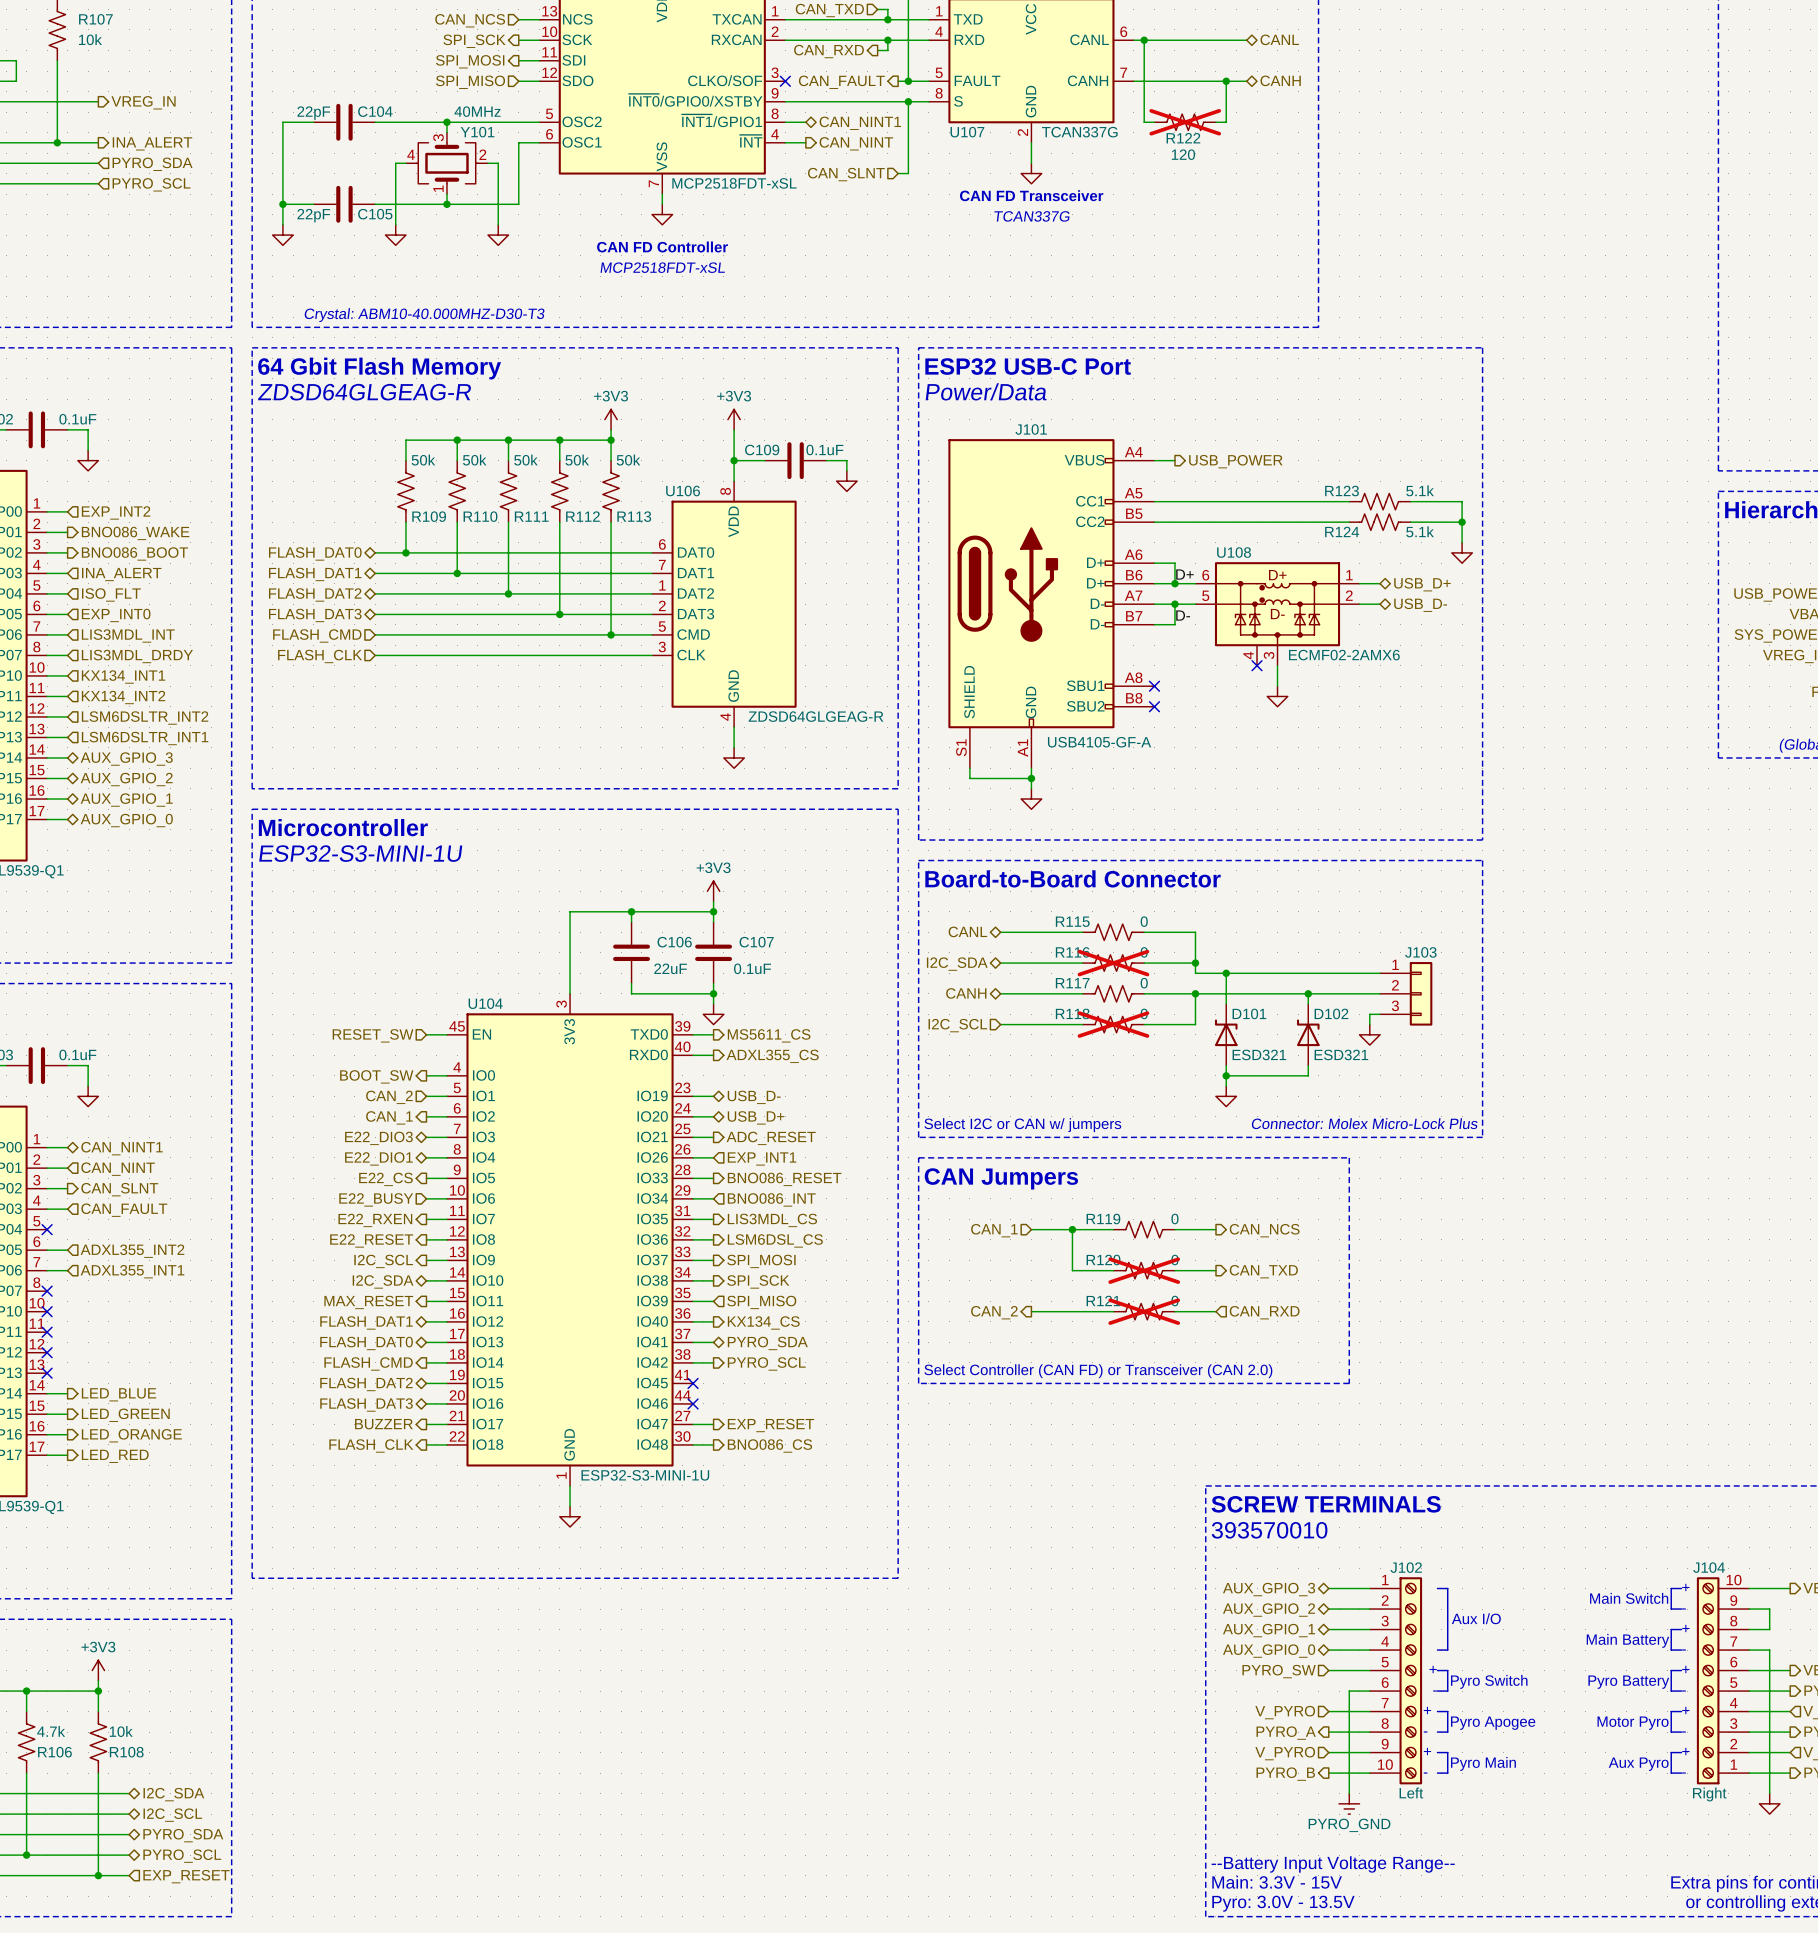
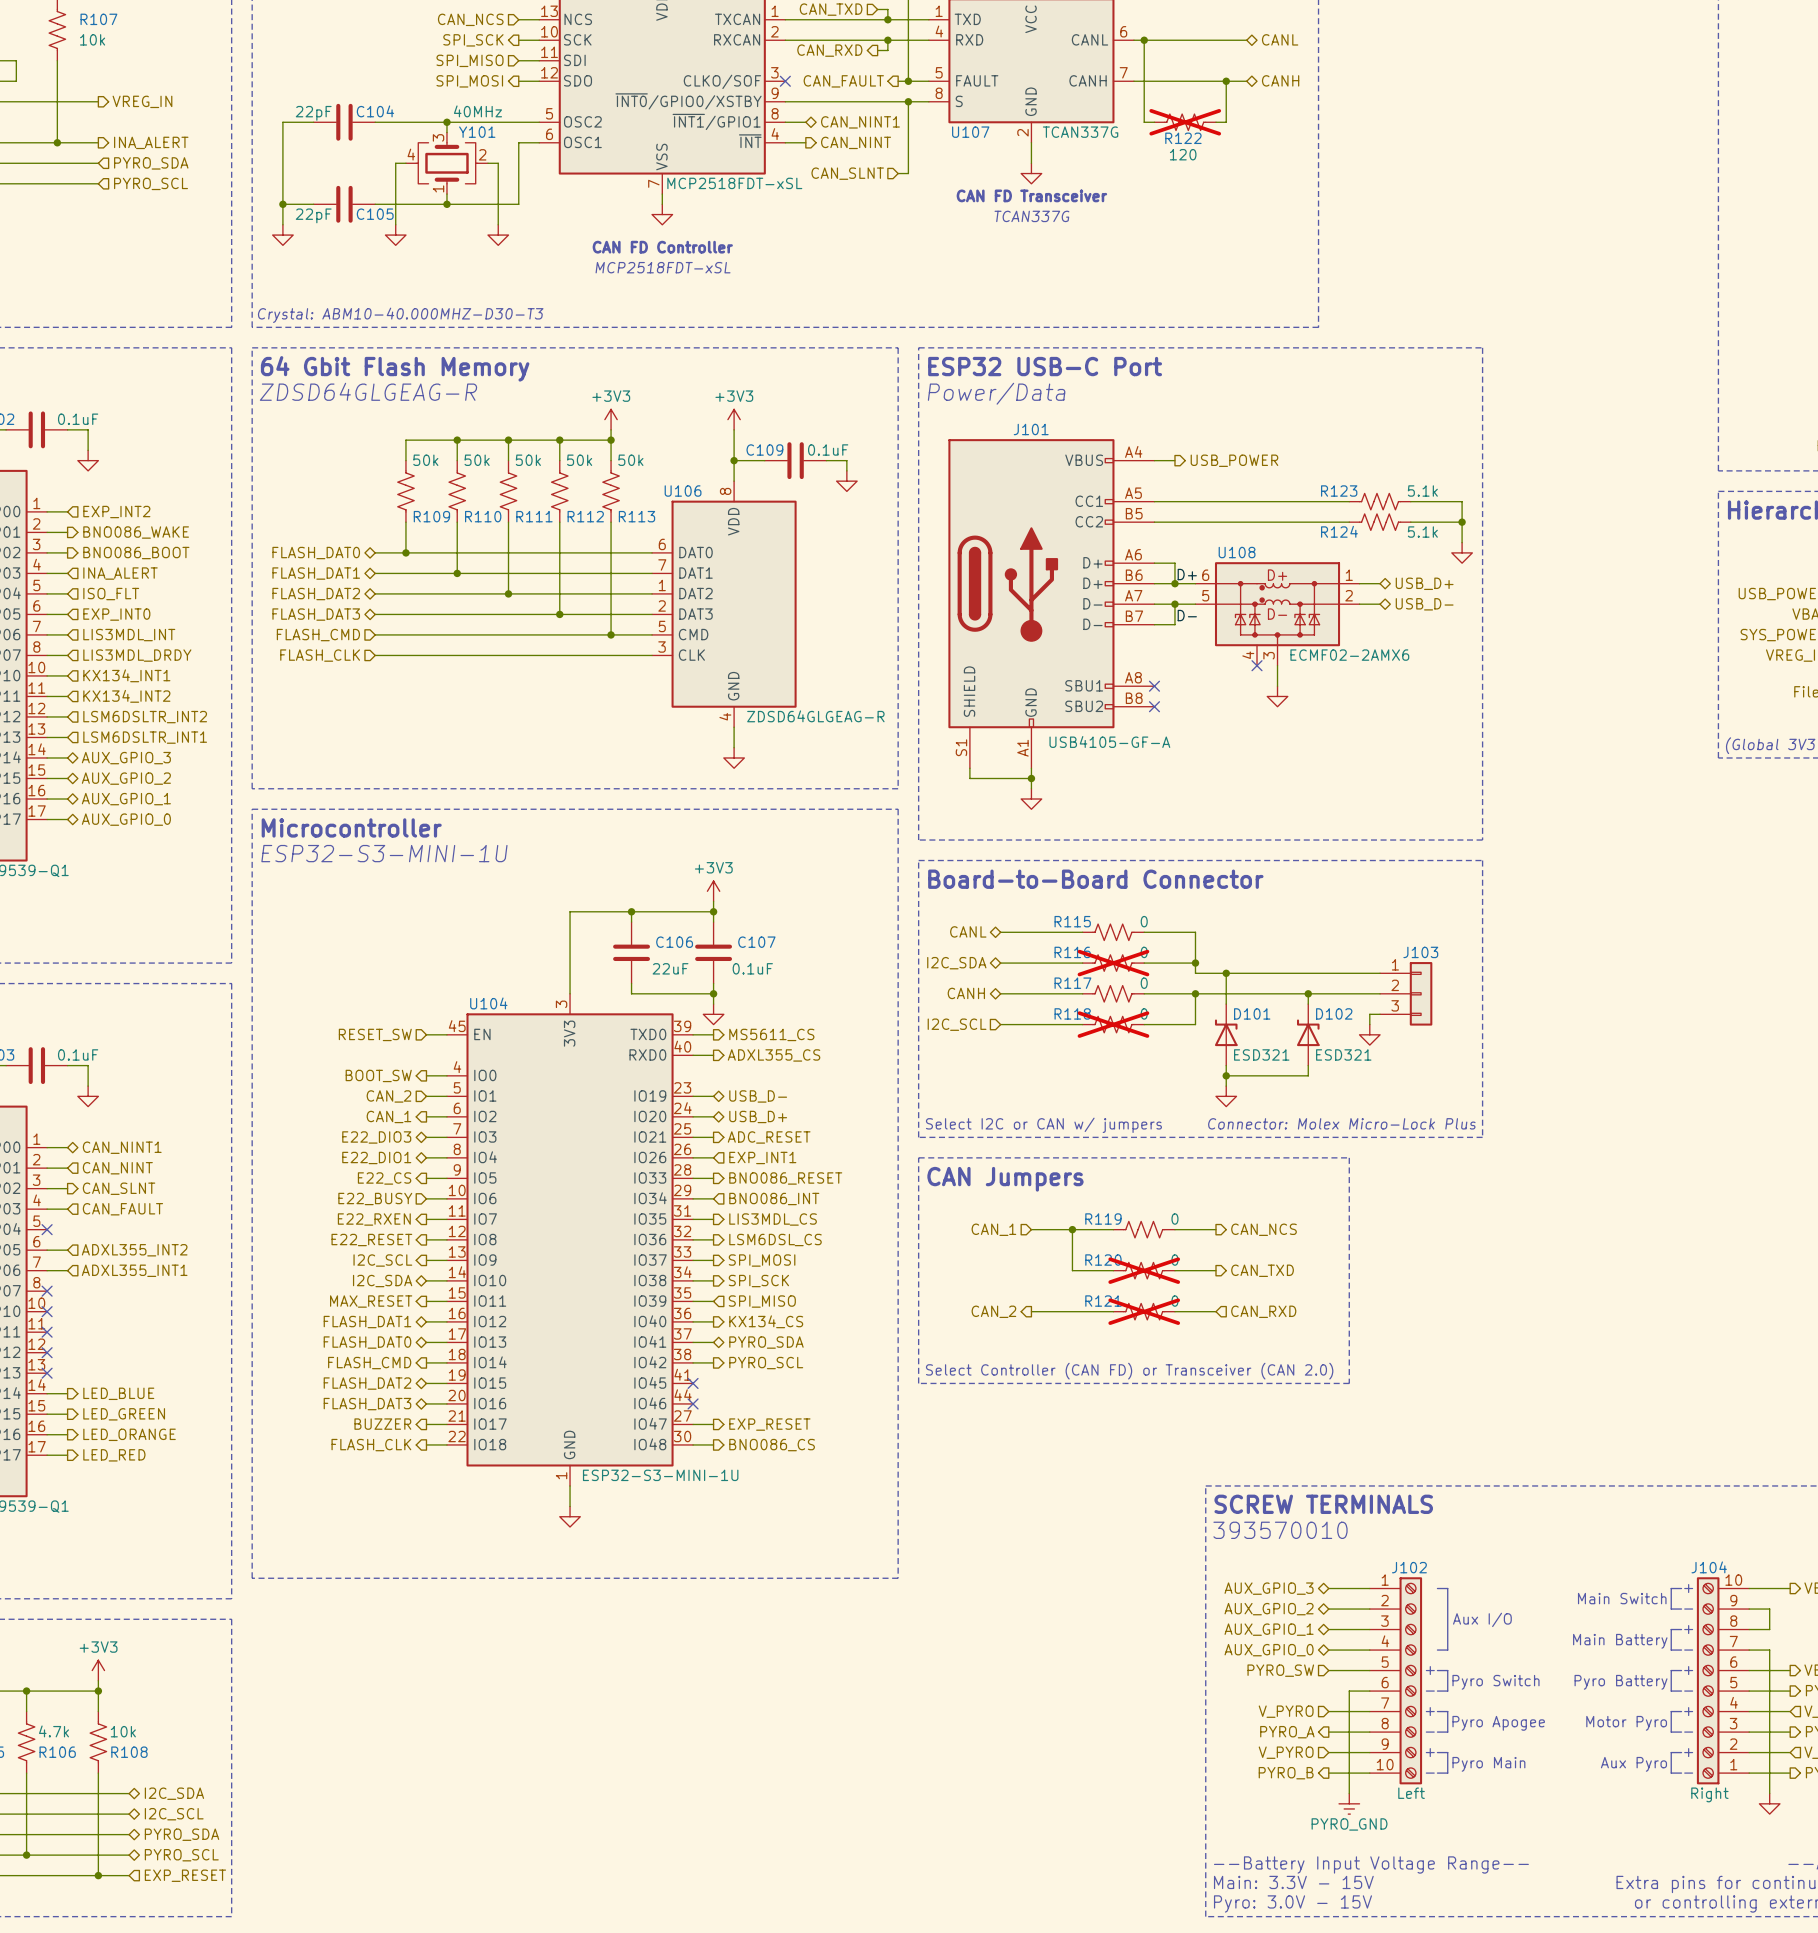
hierarchical label shape: output (470, 61) -> input (470, 60)
hierarchical label: SPI_MOSI (470, 61) -> SPI_MISO (470, 60)
hierarchical label shape: input (470, 82) -> output (469, 81)
hierarchical label: SPI_MISO (470, 82) -> SPI_MOSI (469, 81)
text: Pyro: 3.0V - 13.5V (1283, 1903) -> Pyro: 3.0V - 15V (1292, 1903)

